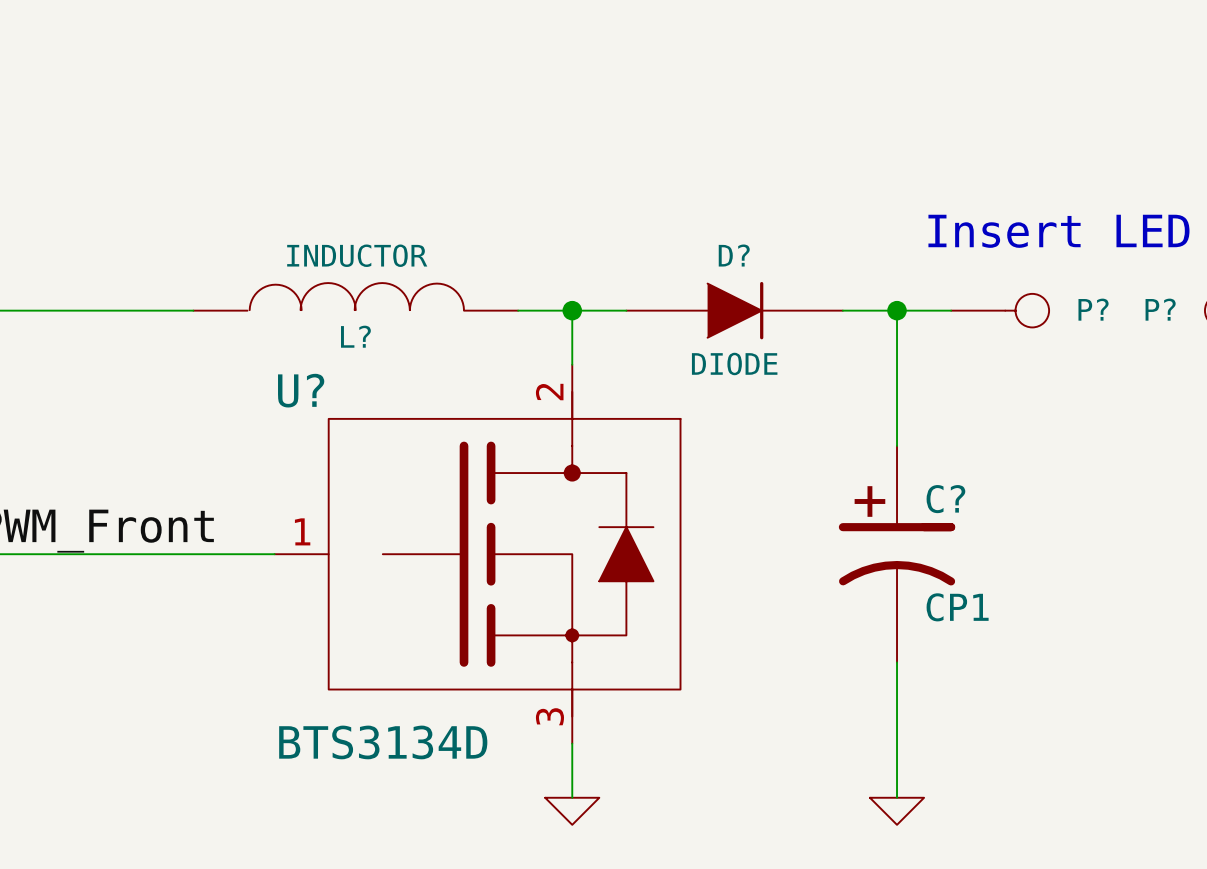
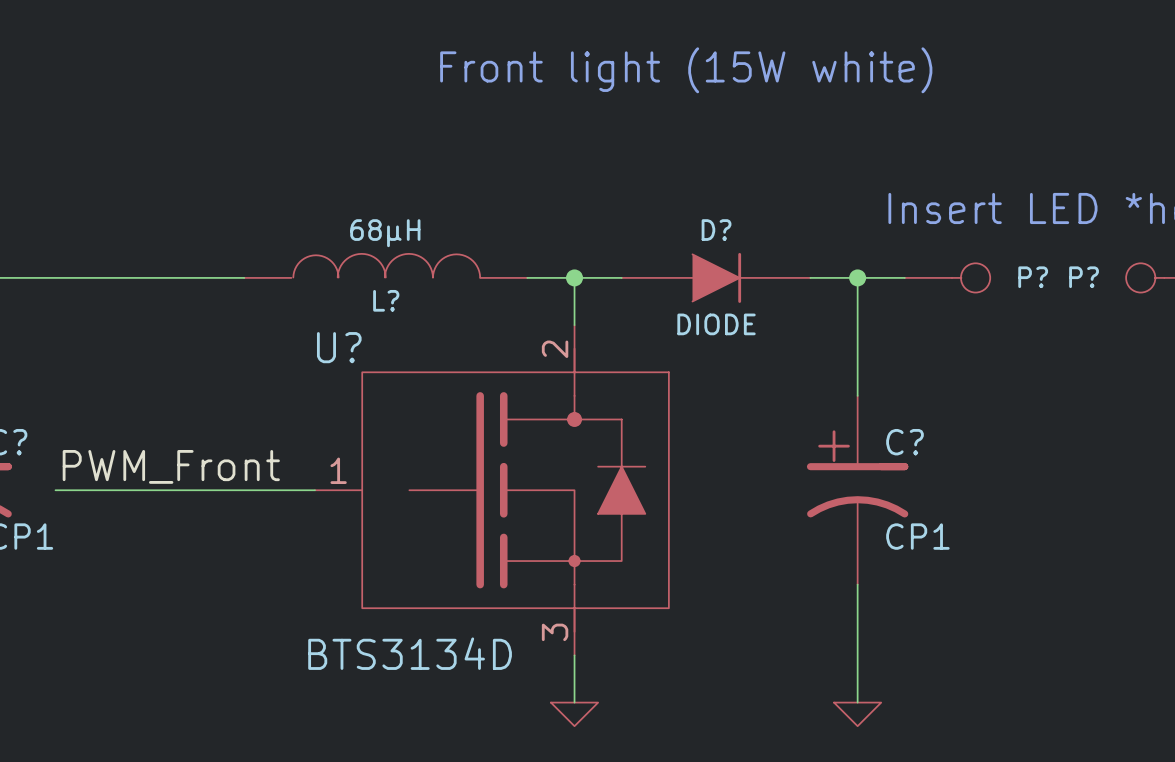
text: none -> Front light (15W white) (686, 70)
L? value: INDUCTOR (357, 255) -> 68µH (385, 233)

